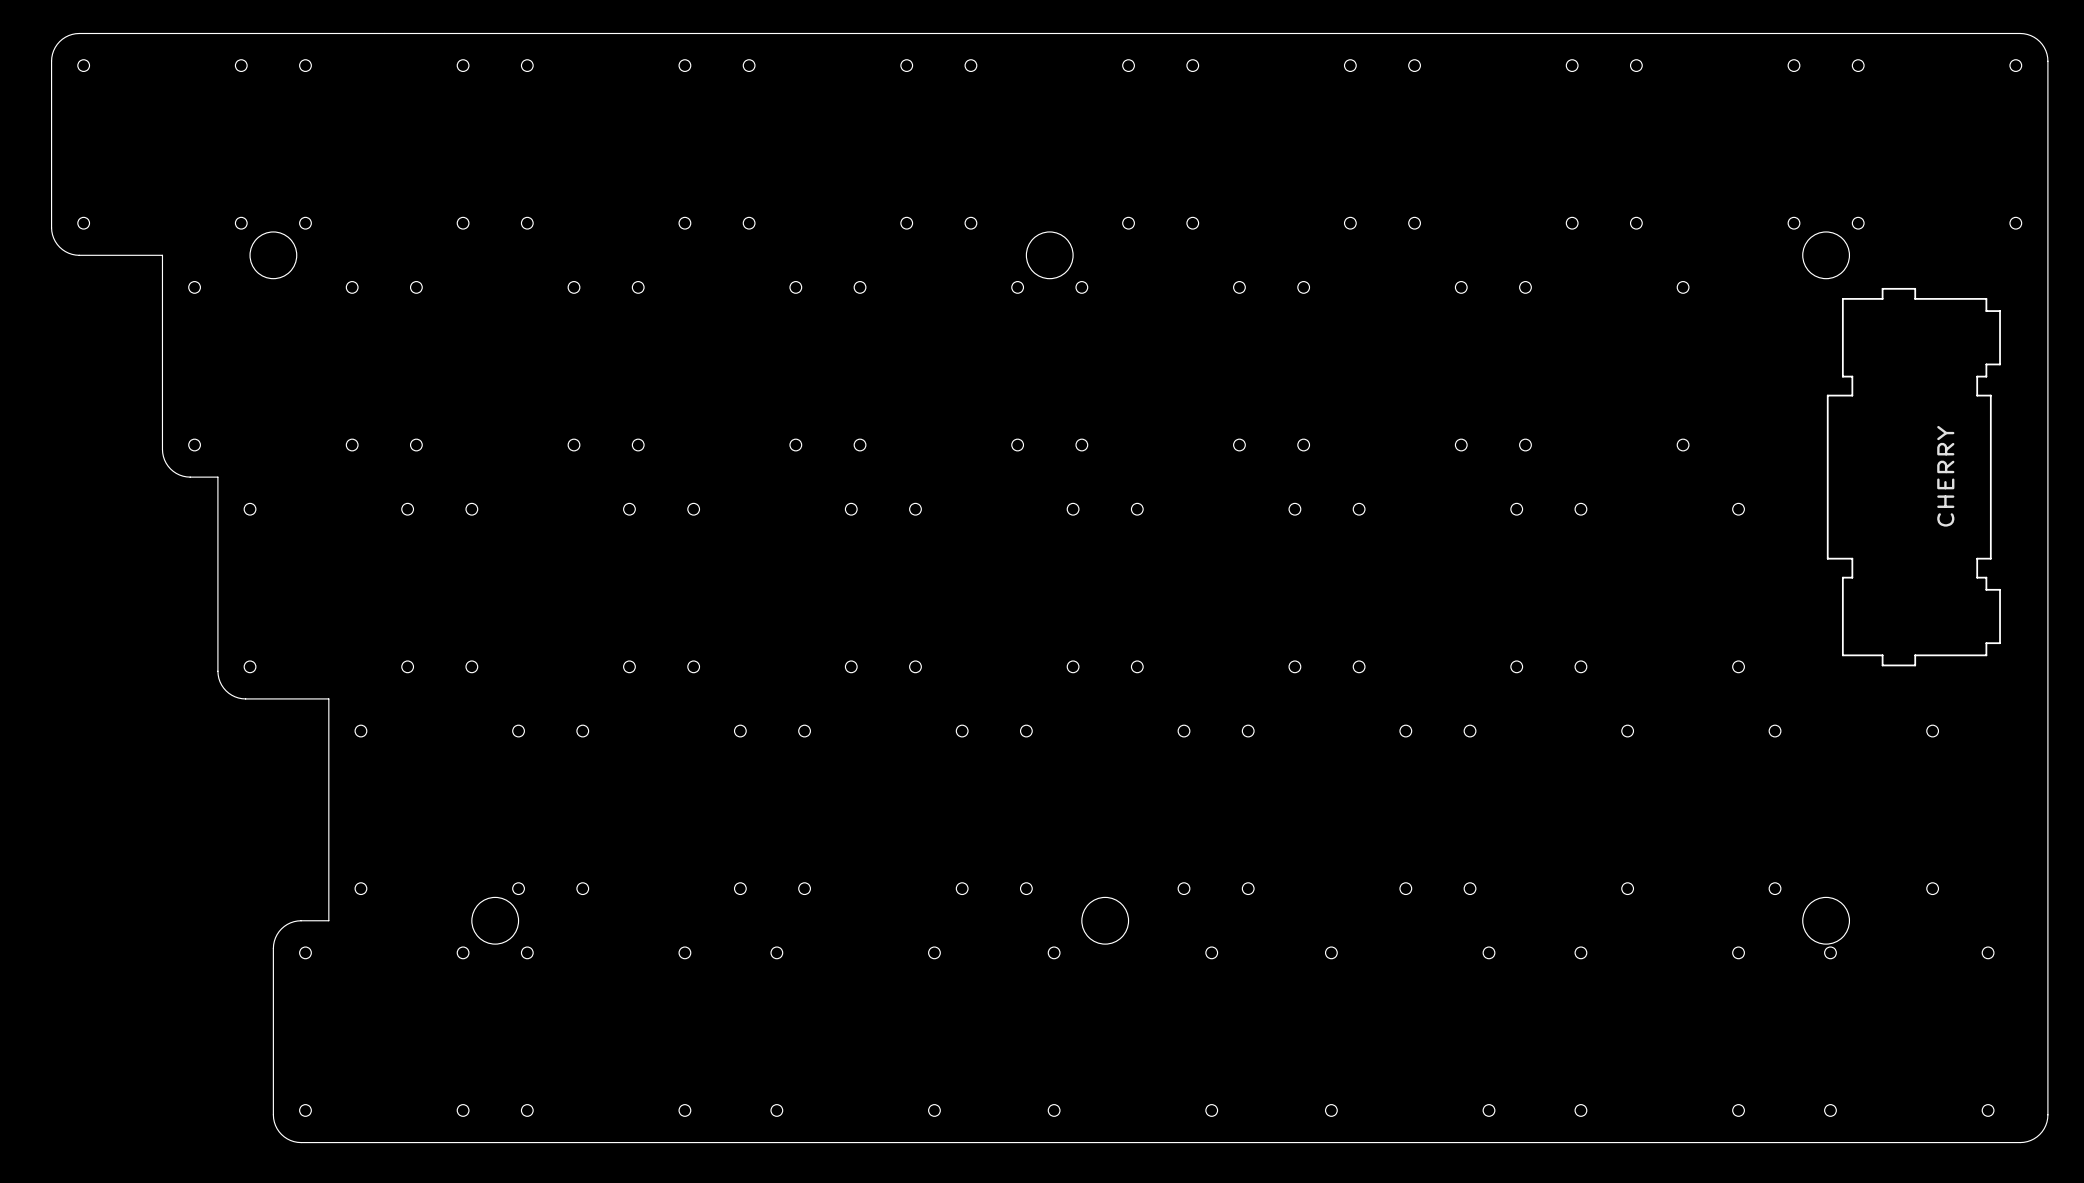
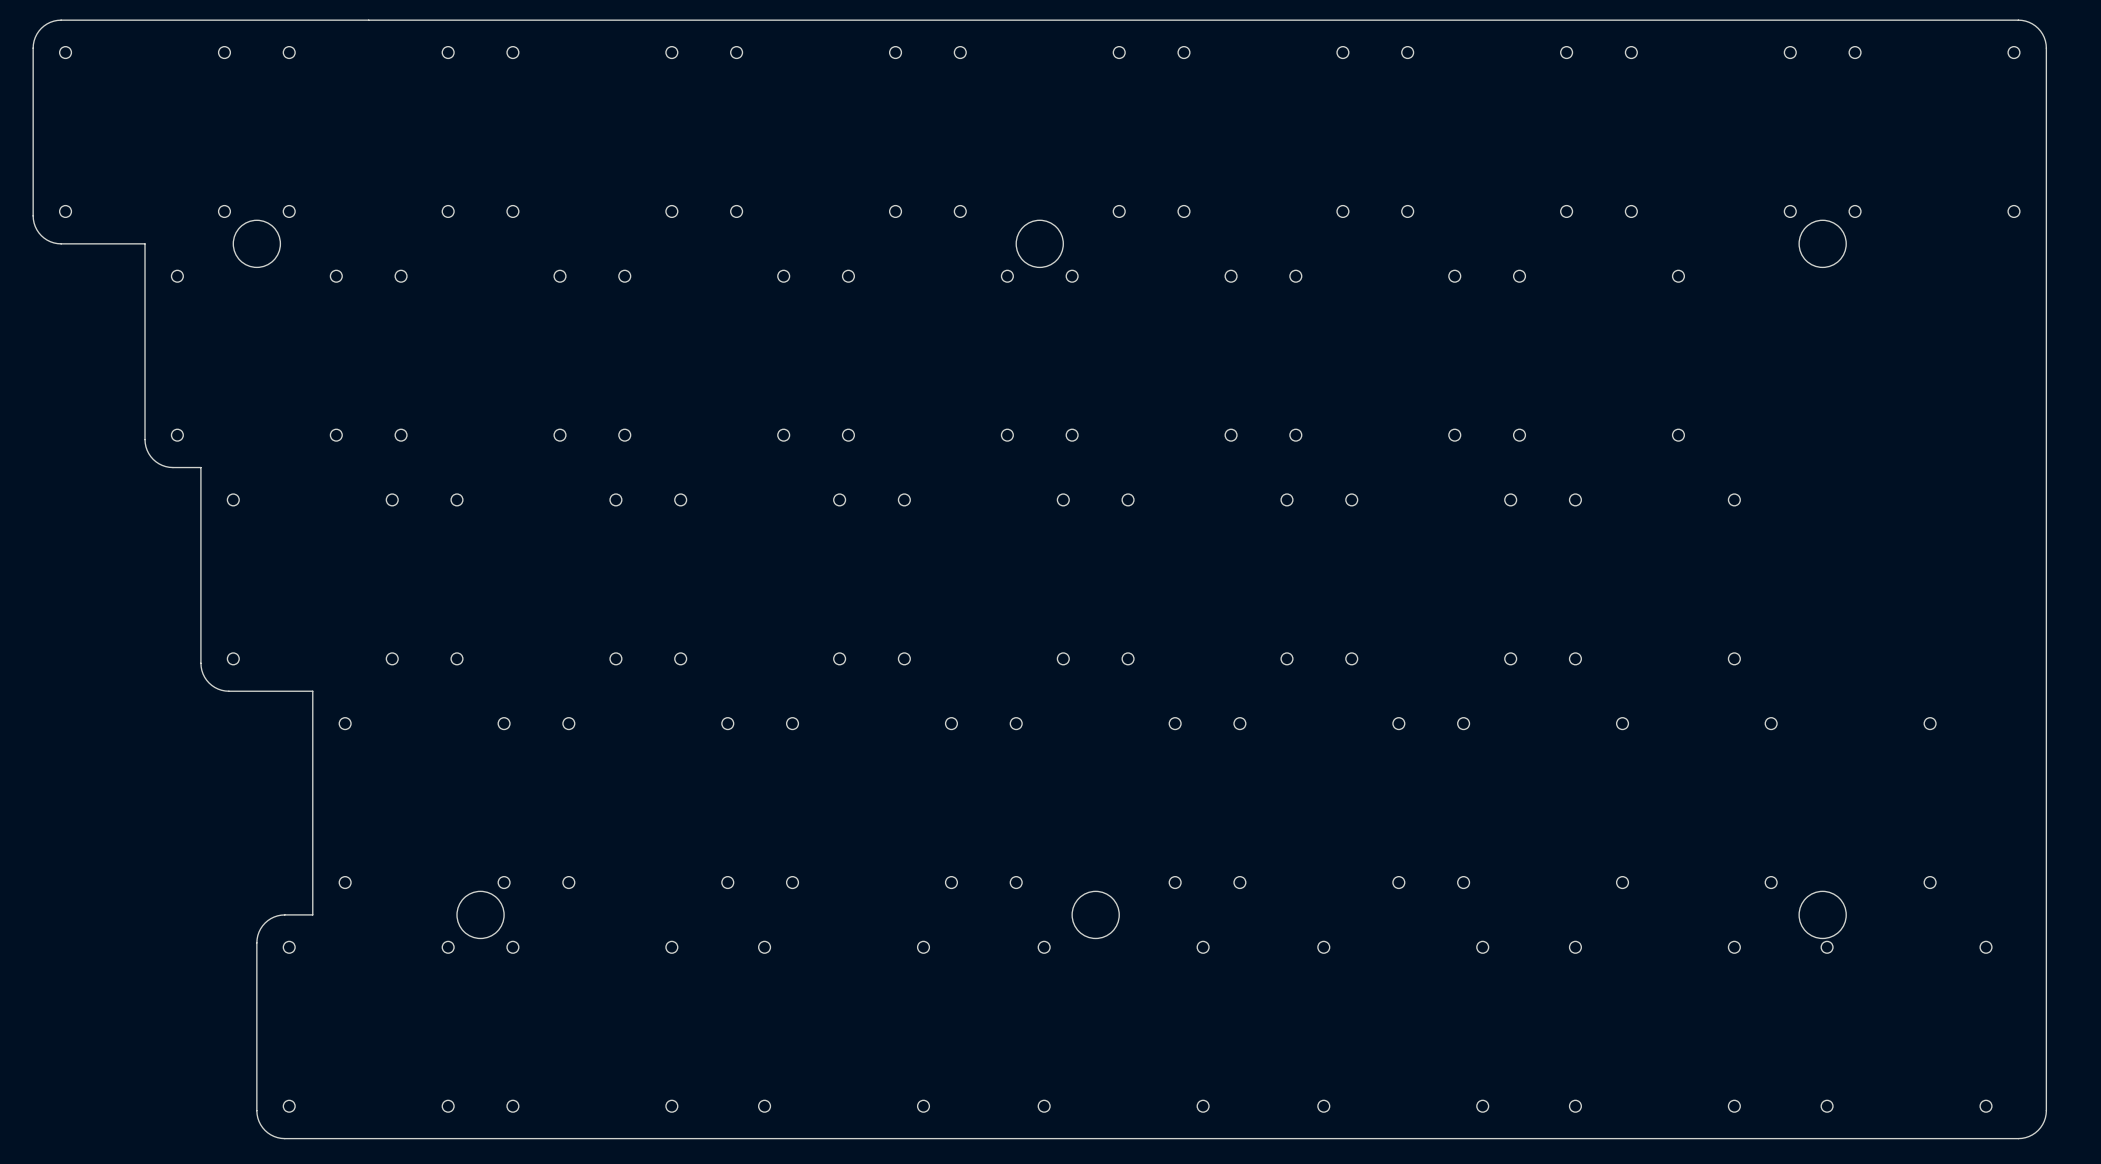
CHERRY: (1913, 477) -> none

